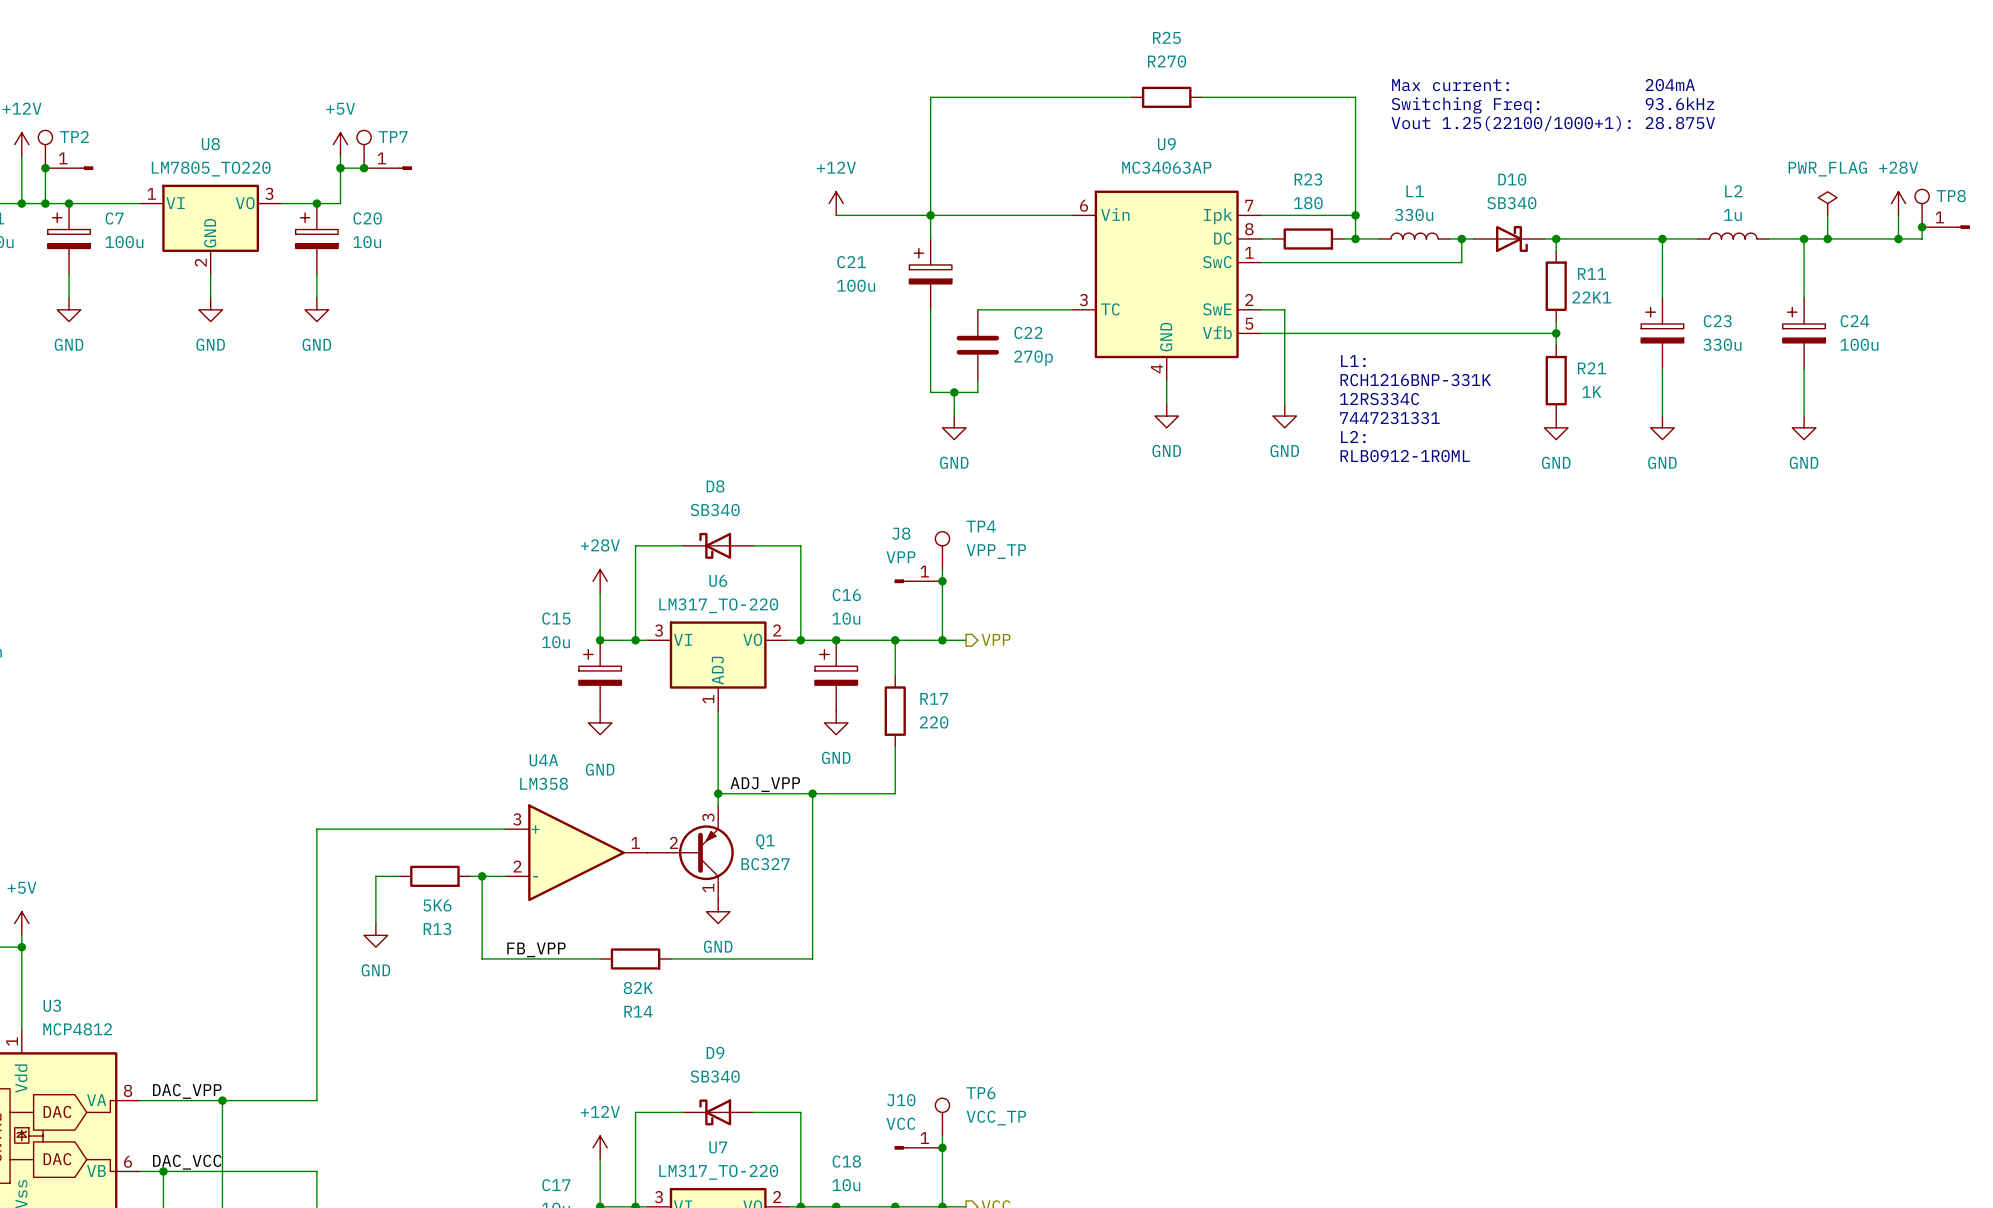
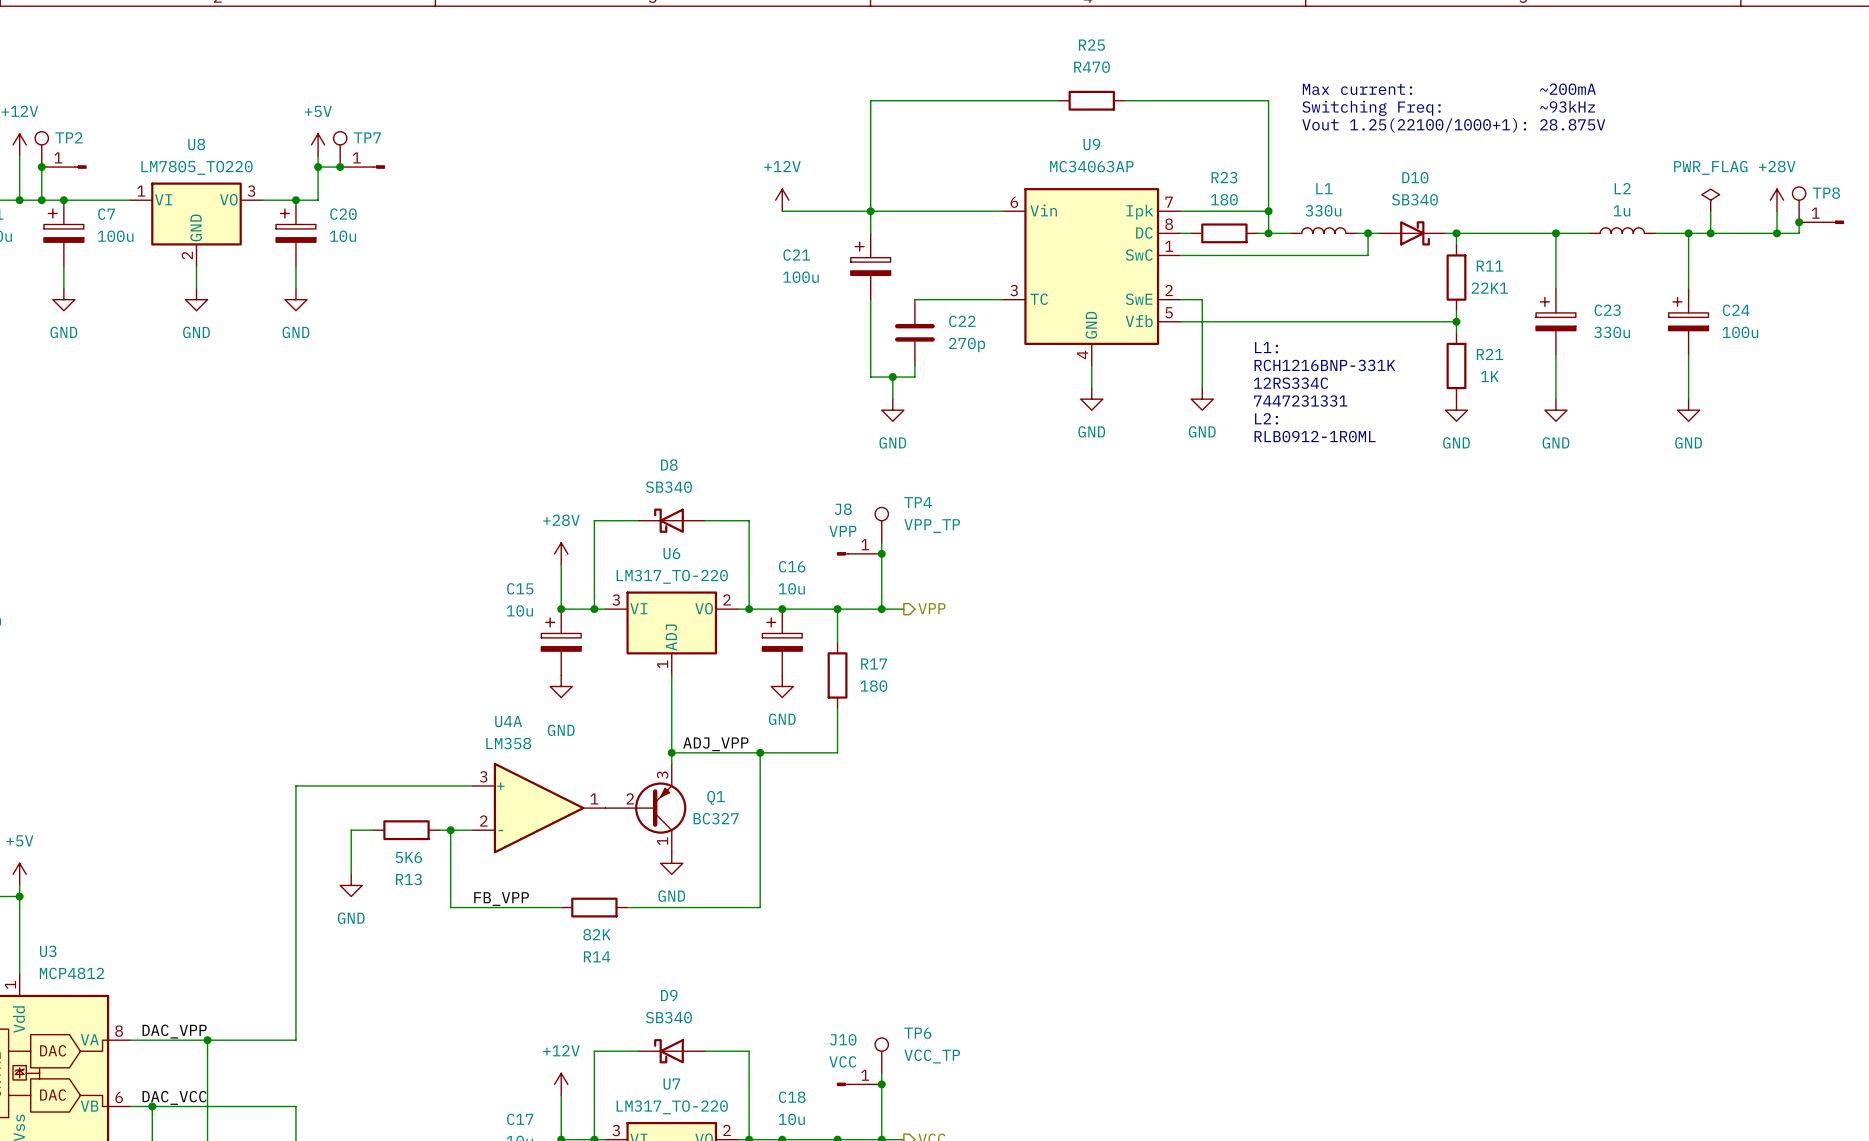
R25 value: R270 (1166, 61) -> R470 (1092, 67)
text: Max current: 204mA (1543, 85) -> Max current: ~200mA (1449, 89)
text: Switching Freq: 93.6kHz (1552, 105) -> Switching Freq: ~93kHz (1448, 108)
R17 value: 220 (934, 722) -> 180 (873, 686)

